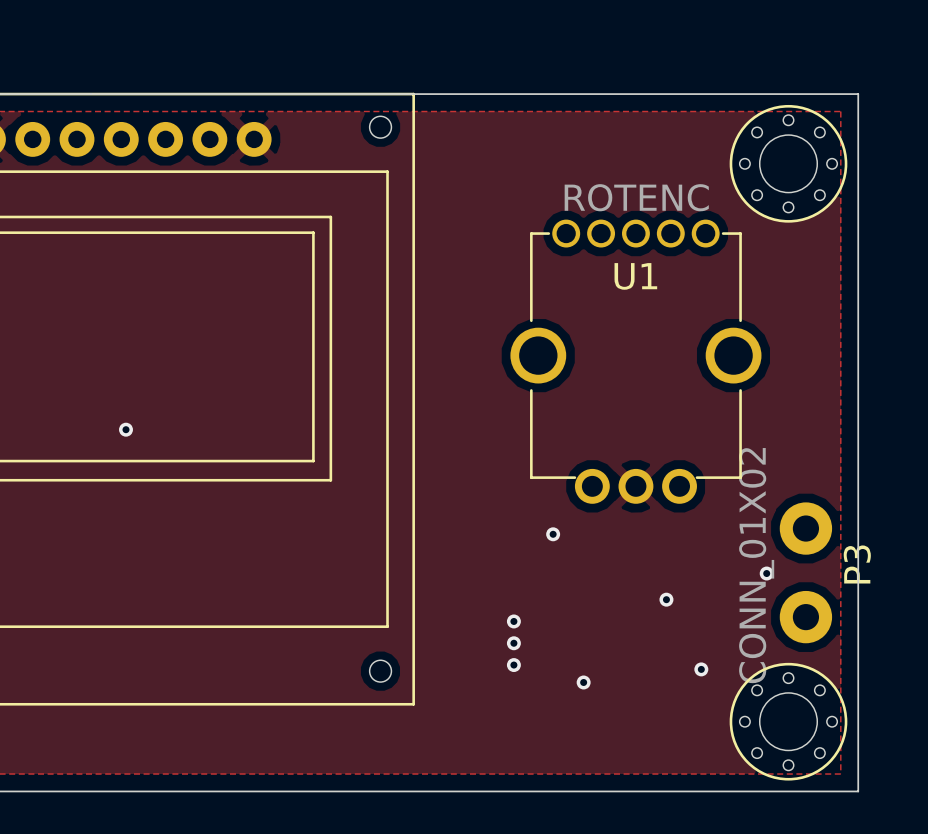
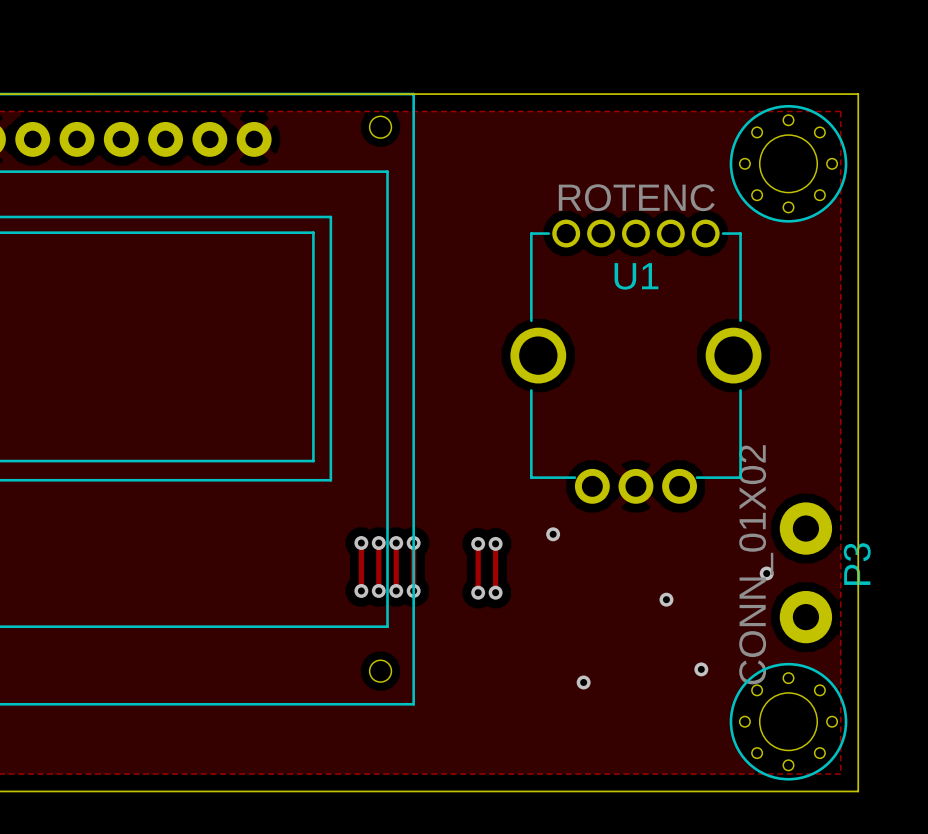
via: (125, 429) -> none
track: none -> (361, 543) (361, 590)
via: none -> (361, 543)
track: none -> (378, 543) (378, 590)
via: none -> (378, 543)
track: none -> (396, 543) (396, 590)
via: none -> (396, 543)
track: none -> (413, 543) (413, 590)
via: none -> (413, 543)
track: none -> (478, 543) (478, 592)
via: none -> (478, 543)
track: none -> (495, 543) (495, 592)
via: none -> (495, 543)
via: none -> (361, 590)
via: none -> (378, 590)
via: none -> (396, 590)
via: none -> (413, 590)
via: none -> (478, 592)
via: none -> (495, 592)
via: (513, 621) -> none
via: (513, 643) -> none
via: (513, 665) -> none

